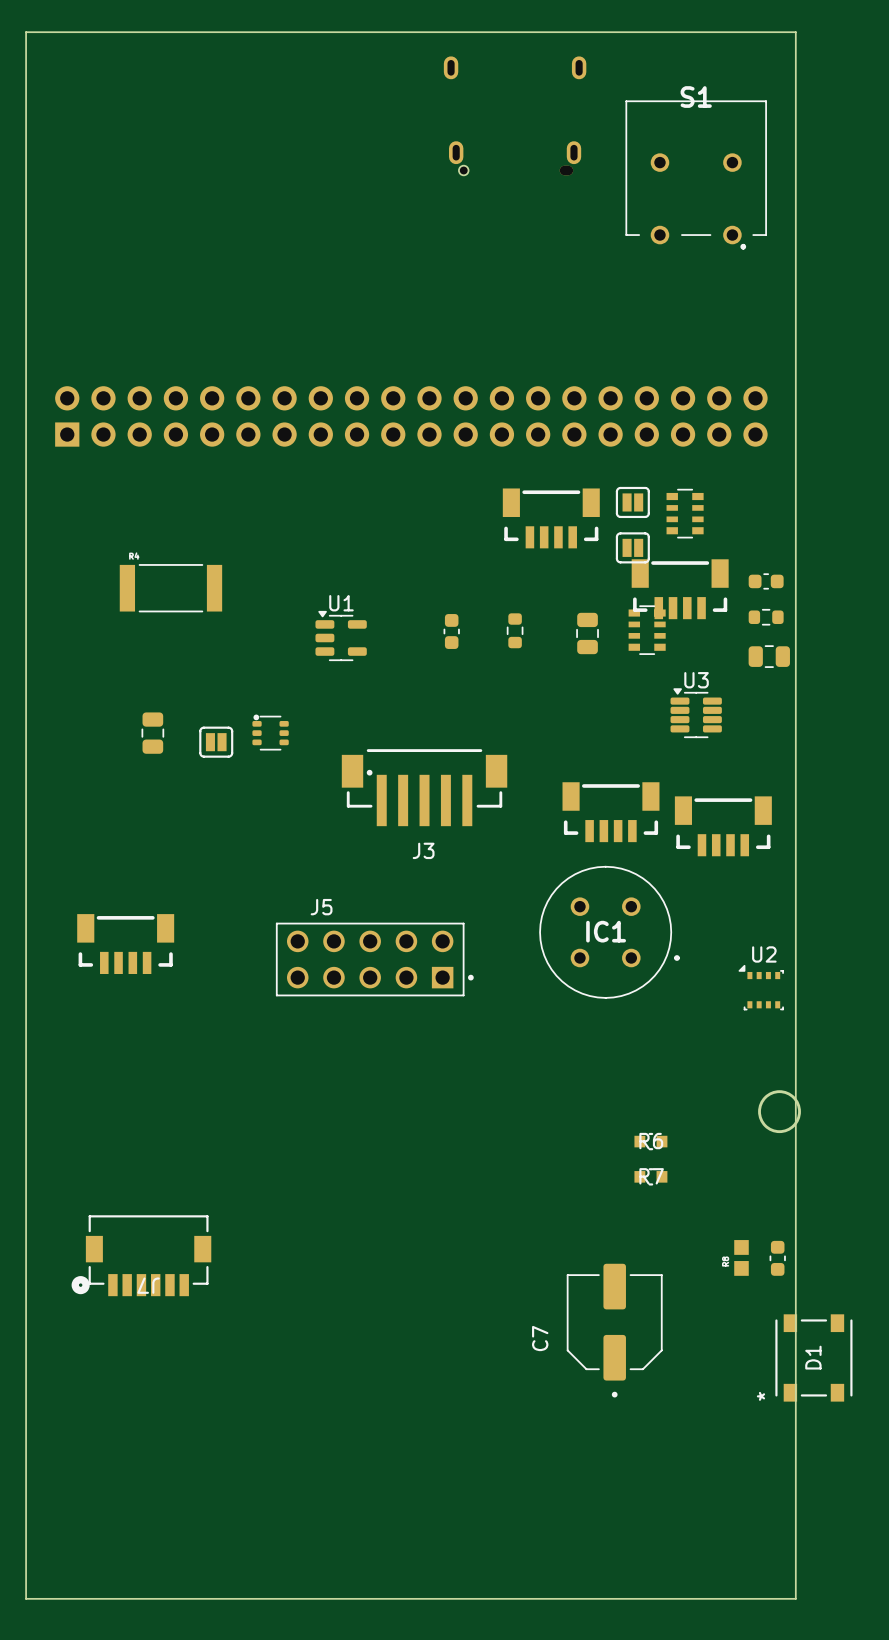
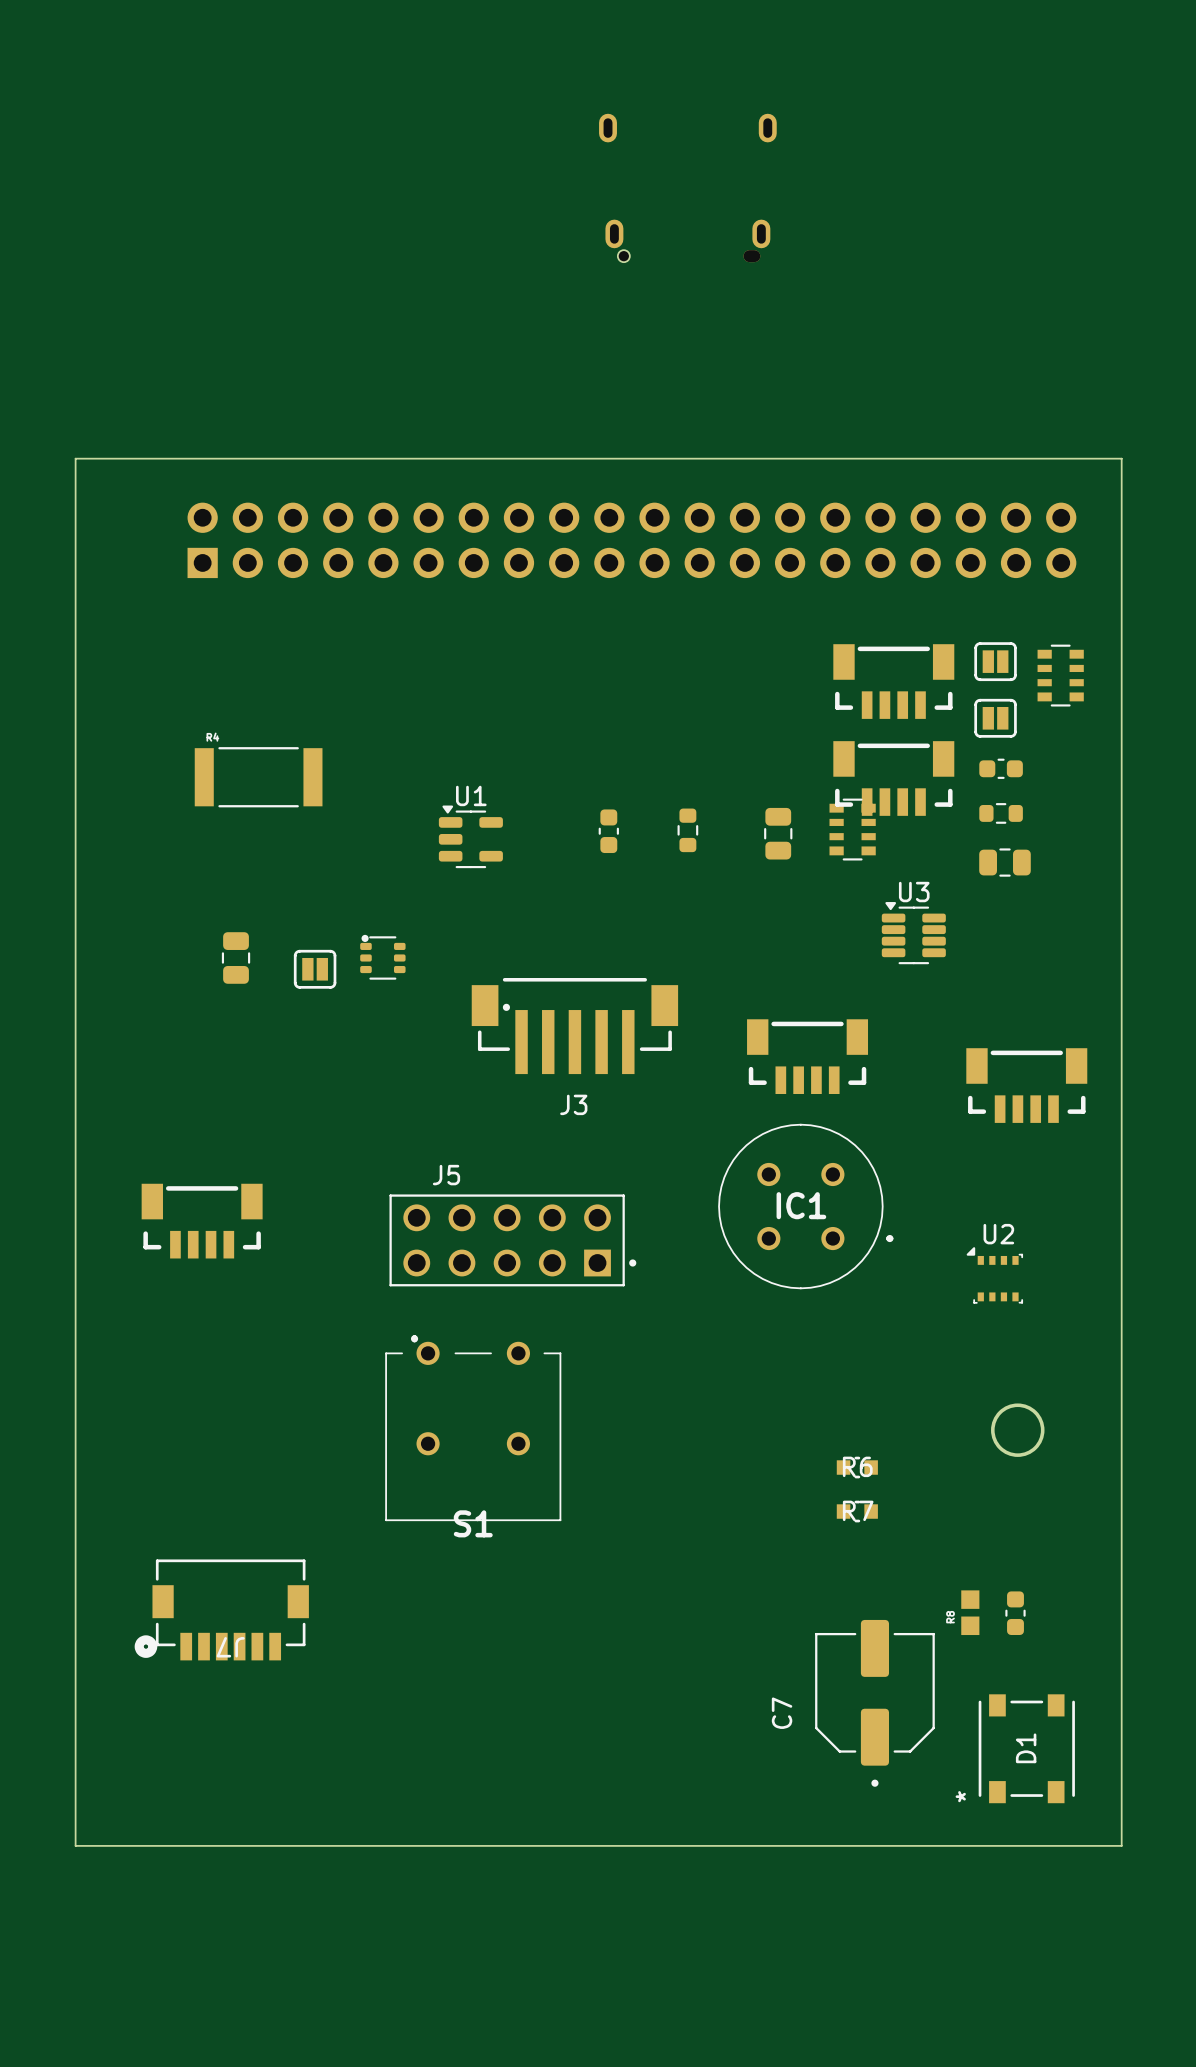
board edge: (26, 32) (795, 32) (795, 1598) (26, 1598) (26, 32) -> (75, 458) (75, 1845) (1121, 1845) (1121, 458) (75, 458)
S1 rotation: 0° (696, 175) -> 180° (473, 1428)
S1 position: (696, 175) -> (473, 1428)
part position: (411, 416) -> (631, 540)
part footprint: [666, 488, 704, 539] -> [833, 644, 955, 719]
part: none -> (995, 661)
part: (632, 502) -> none
part: none -> (1060, 675)
part: (551, 518) -> none
part: none -> (995, 718)
part: (632, 547) -> none
part position: (723, 826) -> (1026, 1085)
C7 position: (614, 1330) -> (874, 1703)
D1 position: (813, 1357) -> (1026, 1748)

